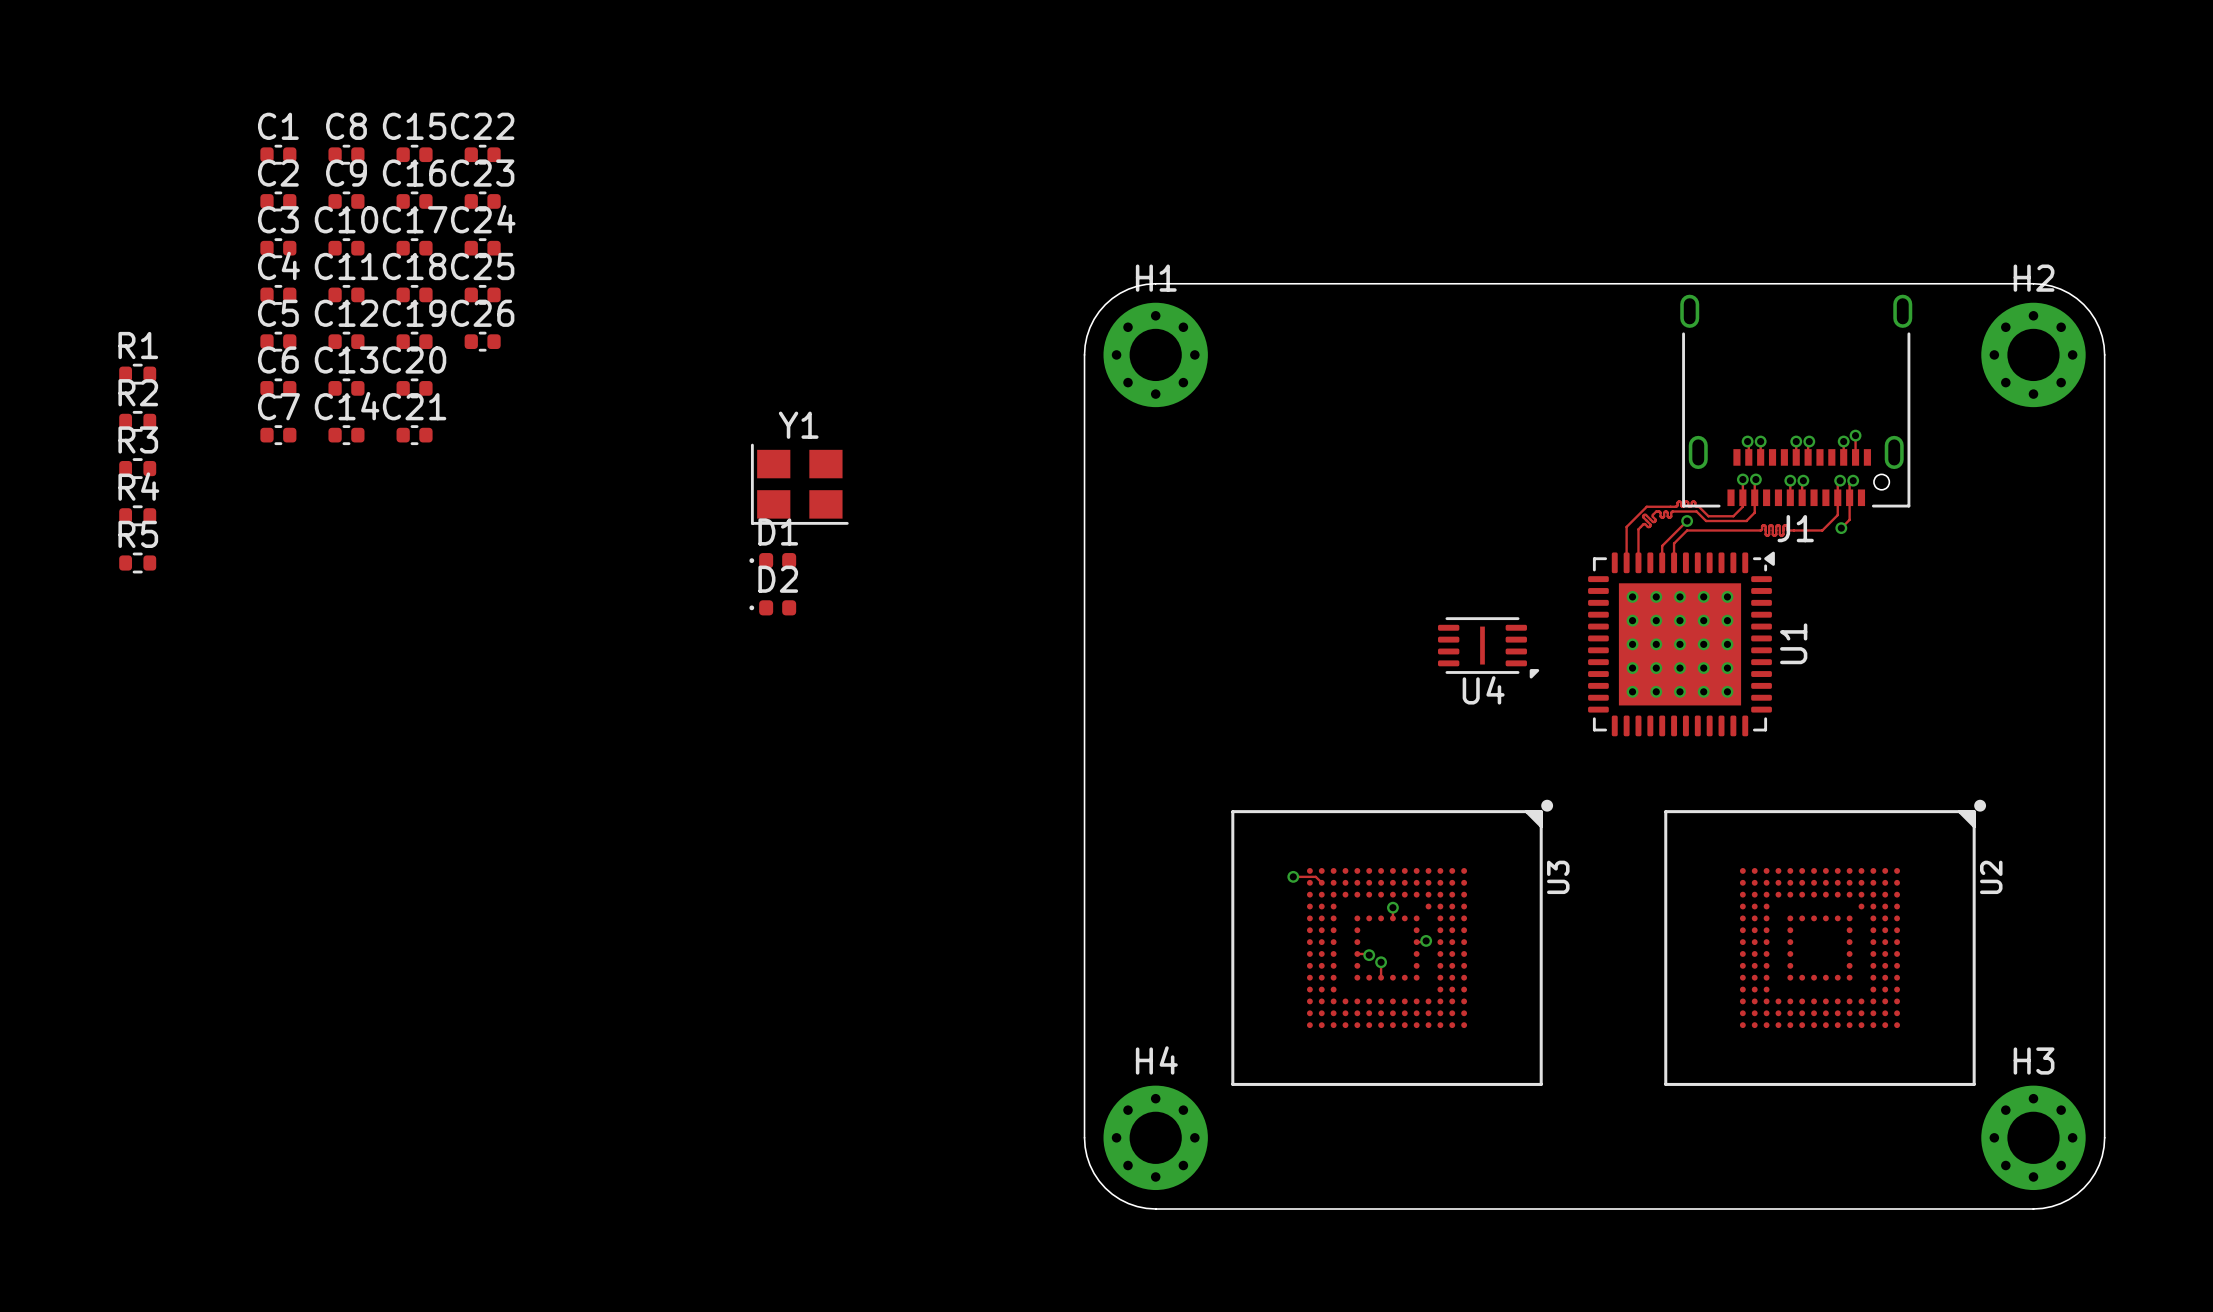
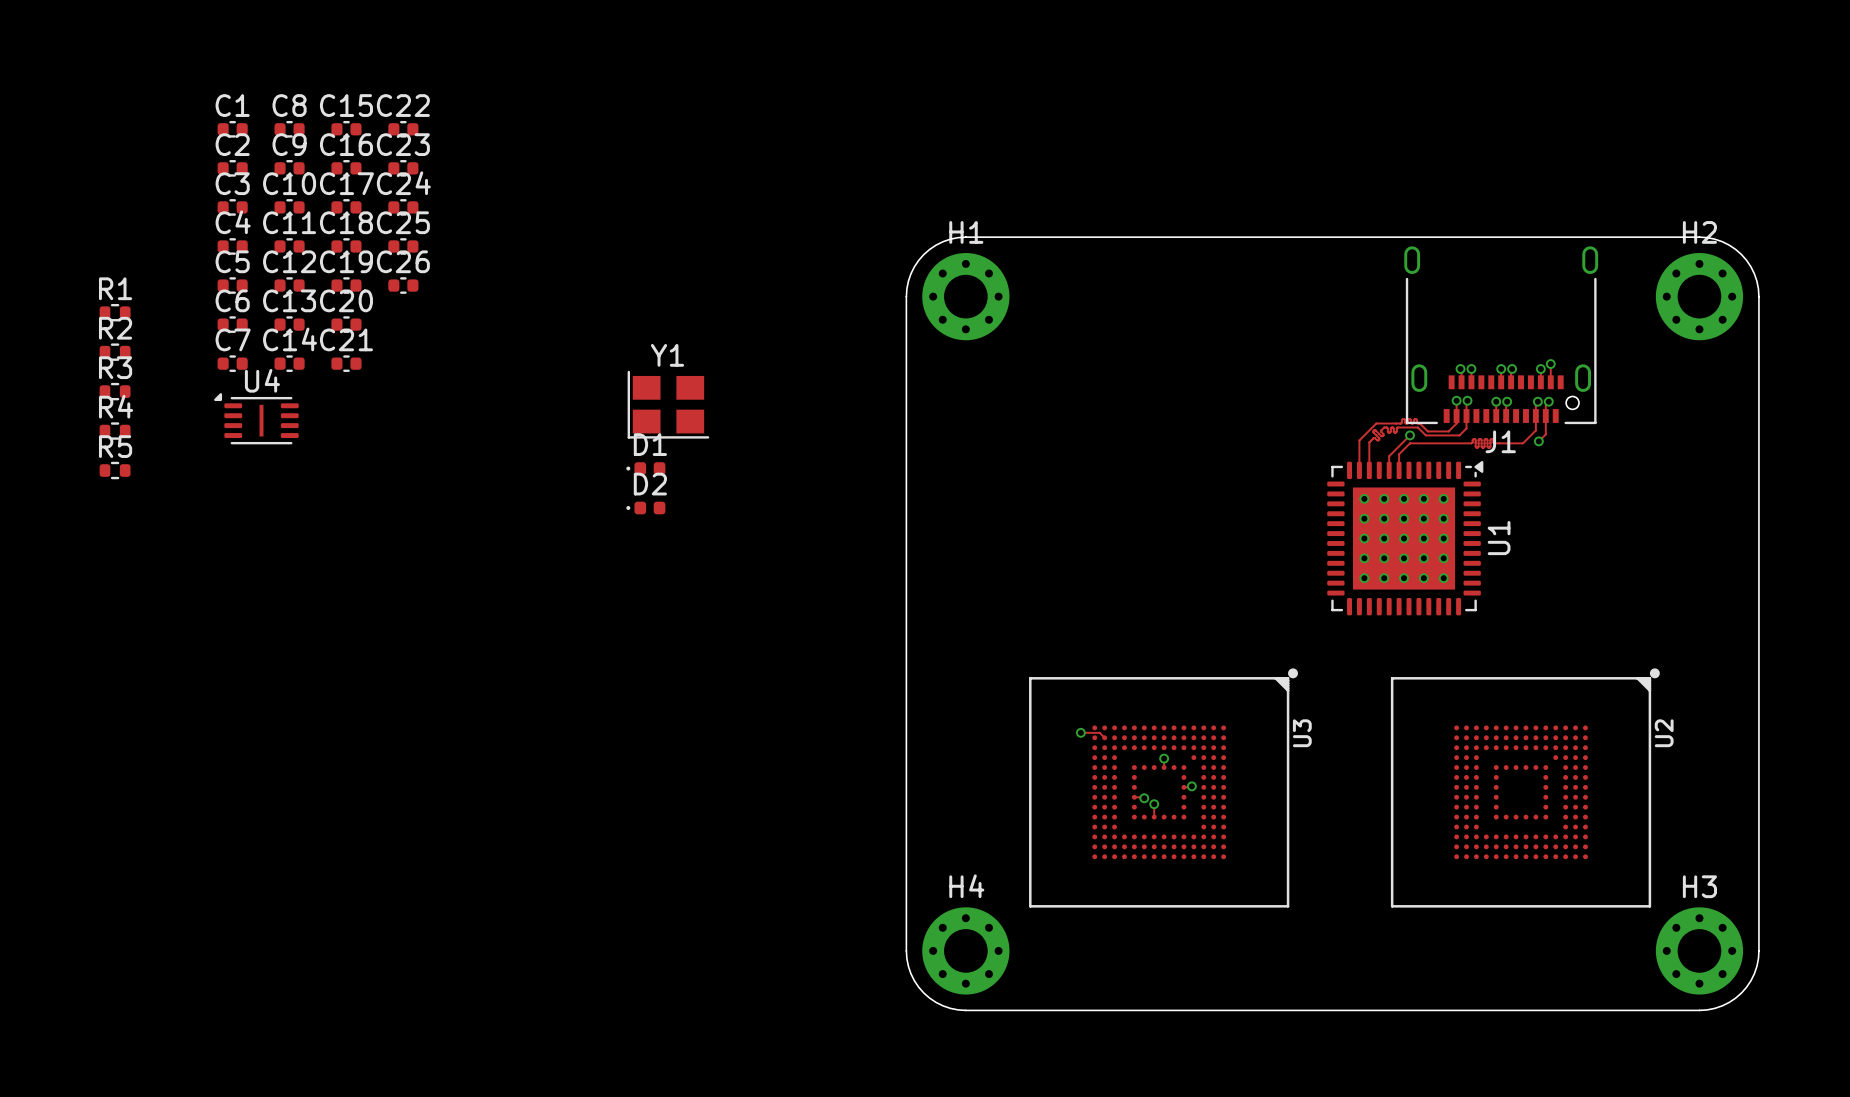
U4 rotation: 0° (1488, 647) -> 180° (256, 418)
U4 position: (1488, 647) -> (256, 418)

